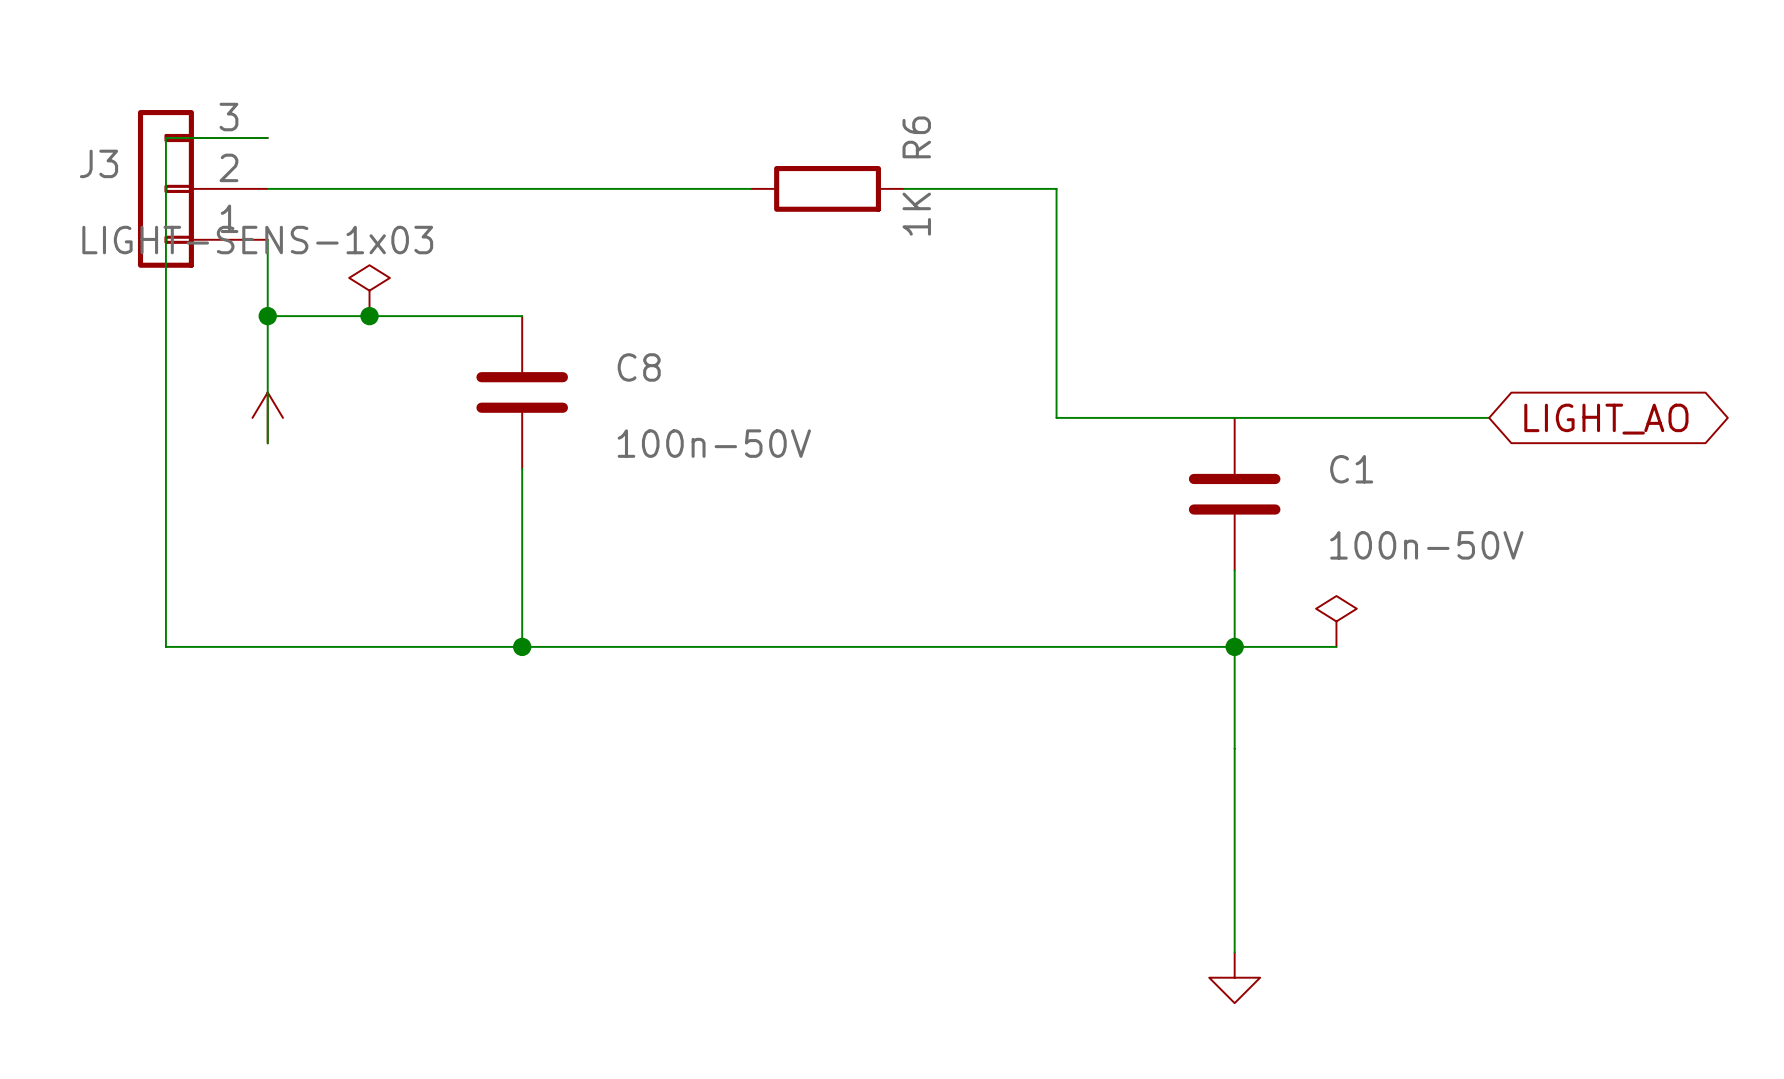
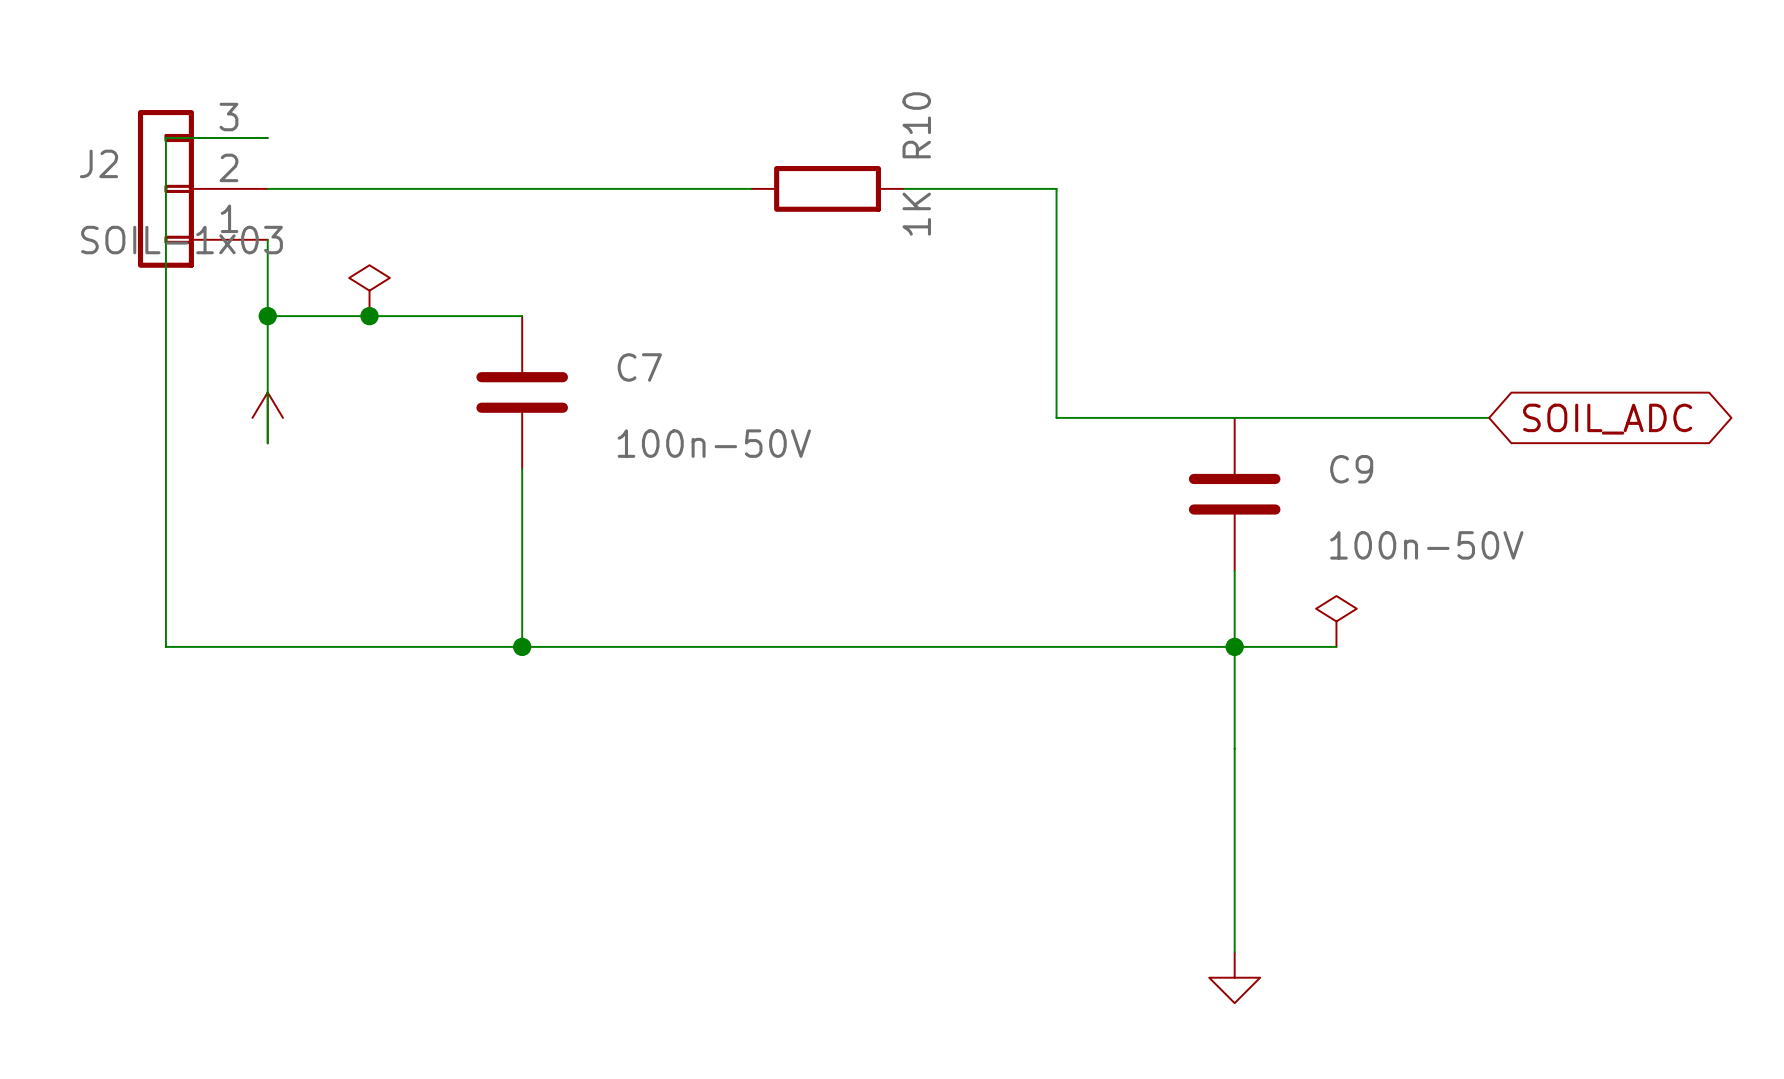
R6 name: R6 (916, 137) -> R10 (916, 125)
J3 name: J3 (99, 163) -> J2 (99, 163)
J3 value: LIGHT-SENS-1x03 (257, 240) -> SOIL-1x03 (182, 240)
C8 name: C8 (639, 367) -> C7 (639, 367)
global label: LIGHT_AO (1606, 419) -> SOIL_ADC (1607, 419)
C1 name: C1 (1351, 469) -> C9 (1351, 469)

